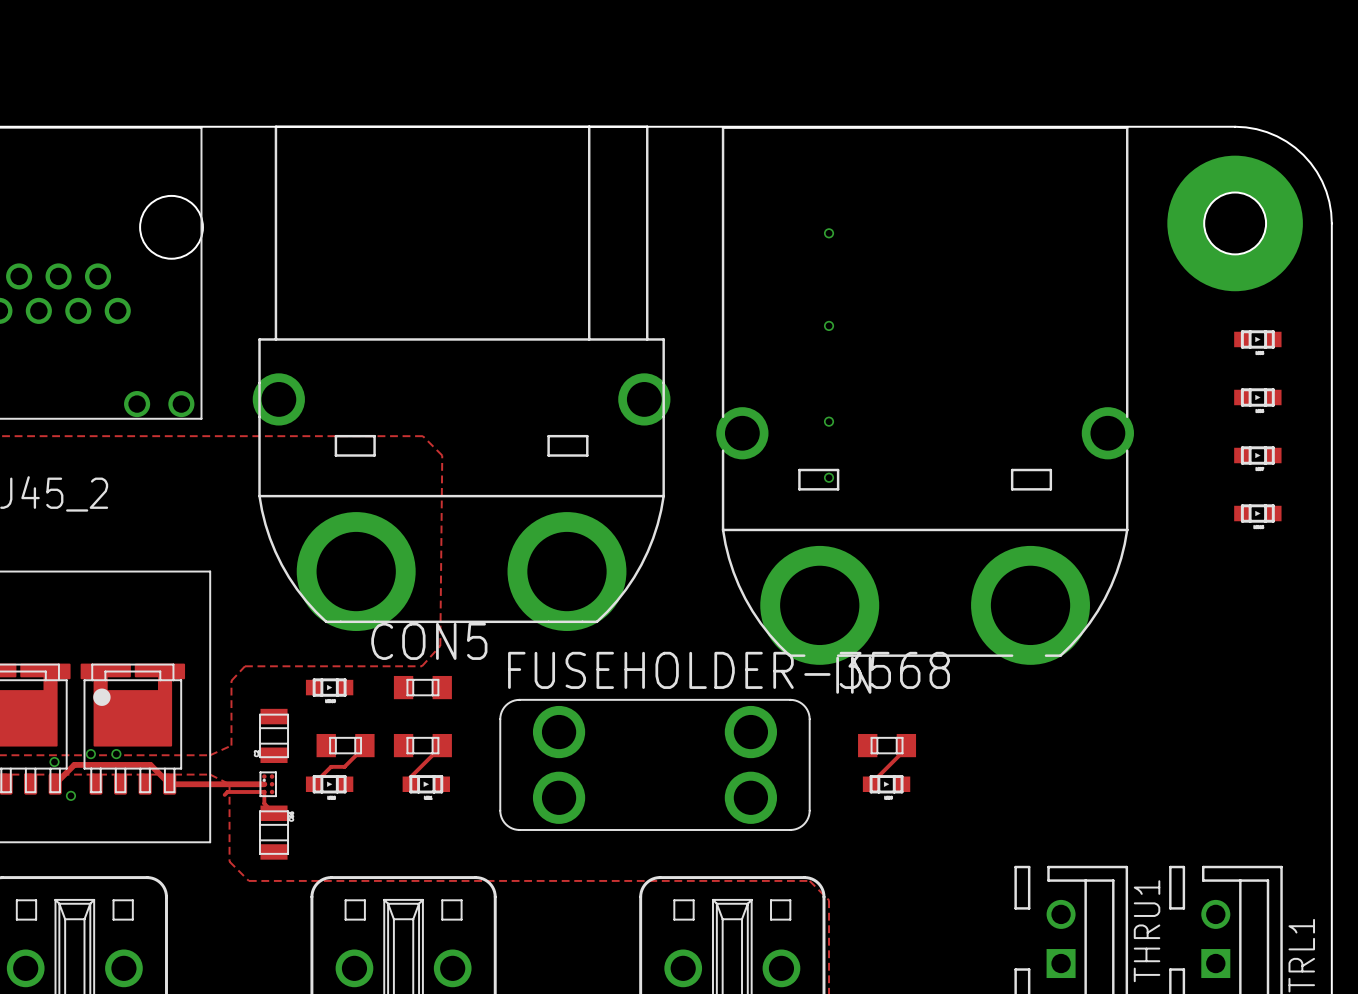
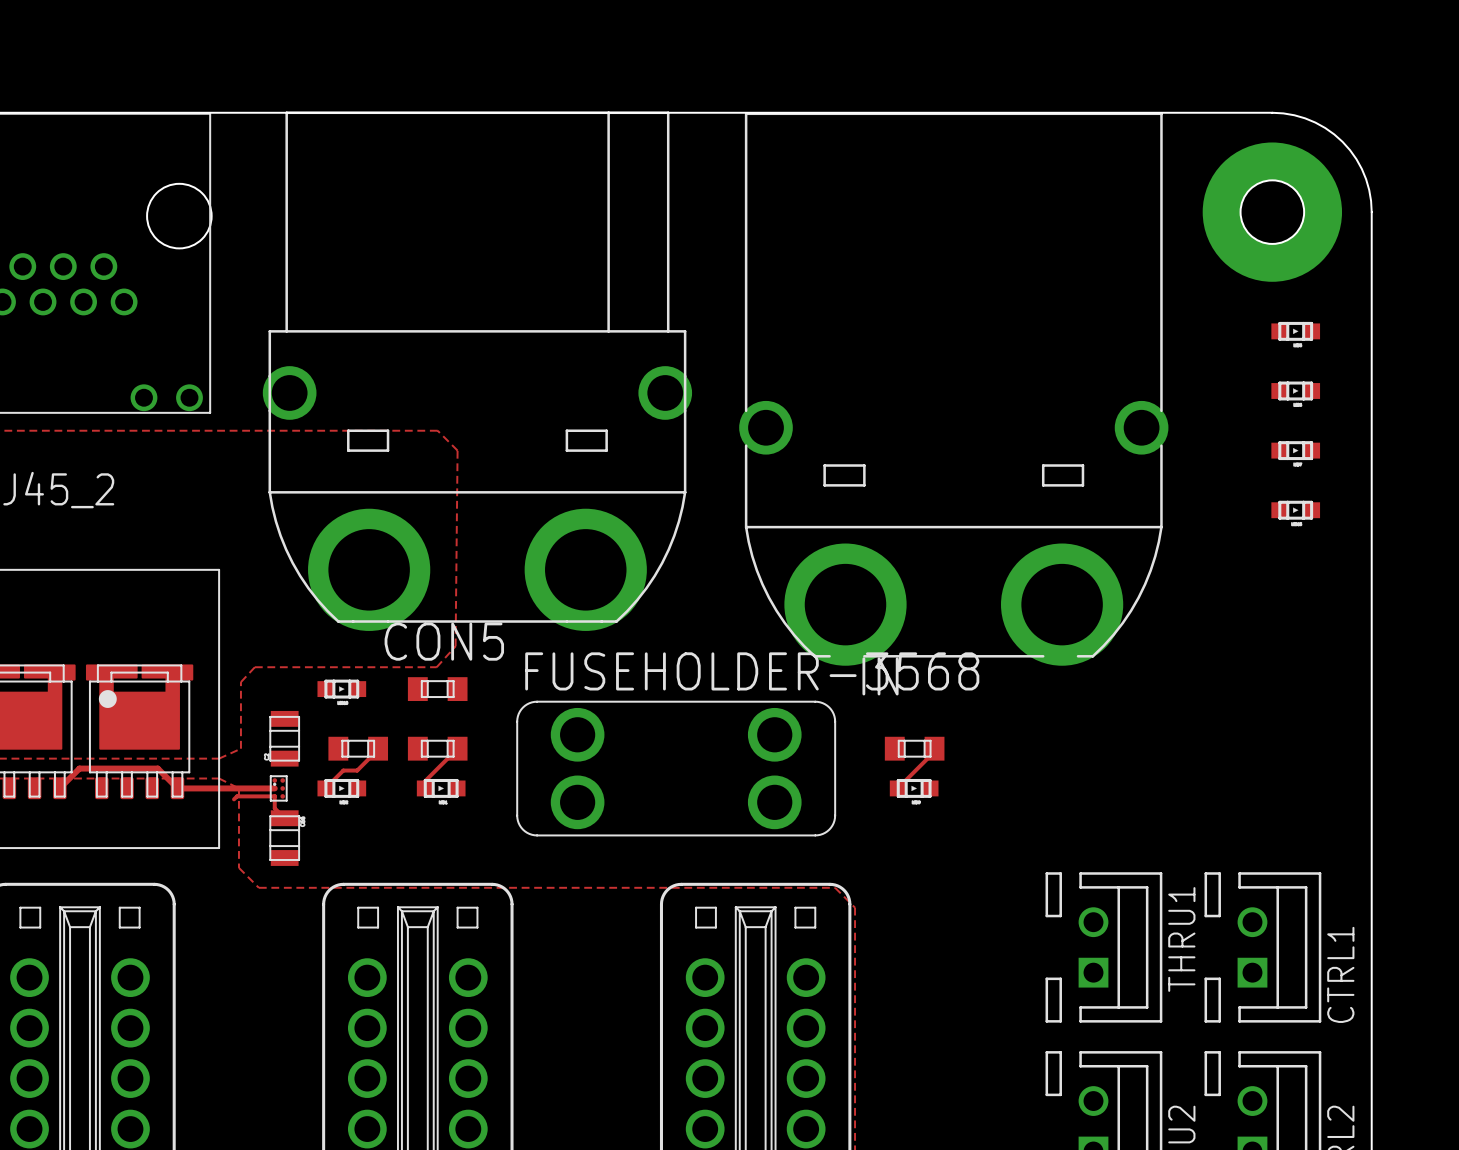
via: (829, 233) -> none
via: (829, 325) -> none
via: (829, 421) -> none
via: (829, 477) -> none
via: (90, 754) -> none
via: (116, 754) -> none
via: (54, 762) -> none
via: (70, 795) -> none

